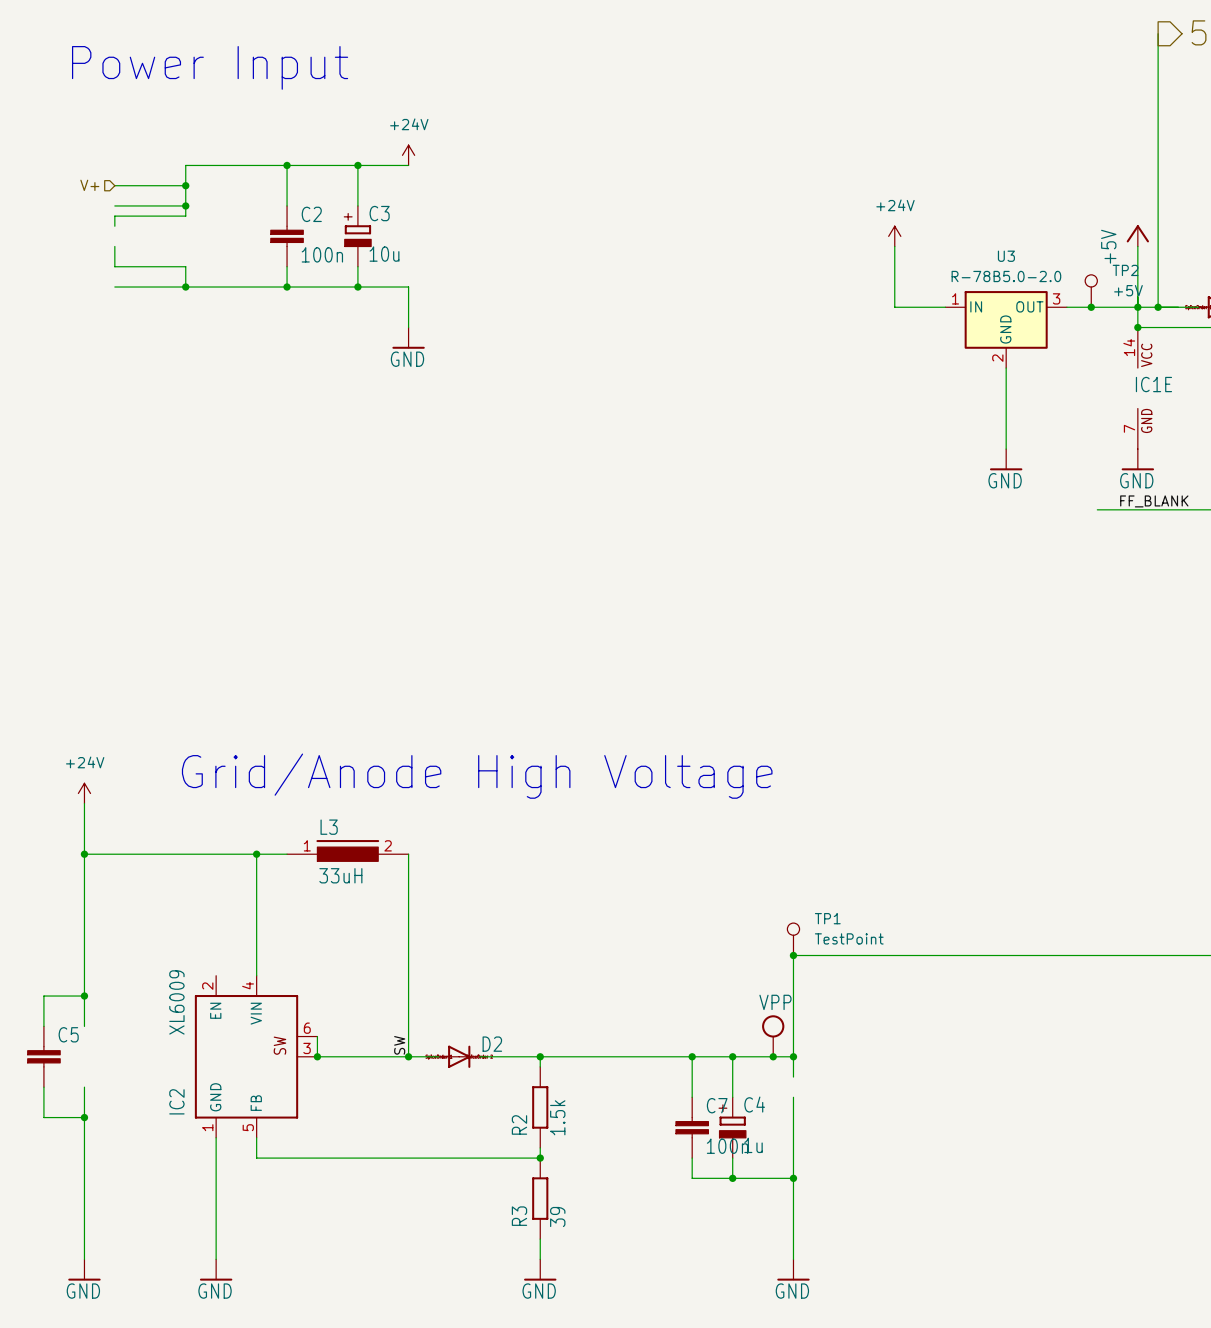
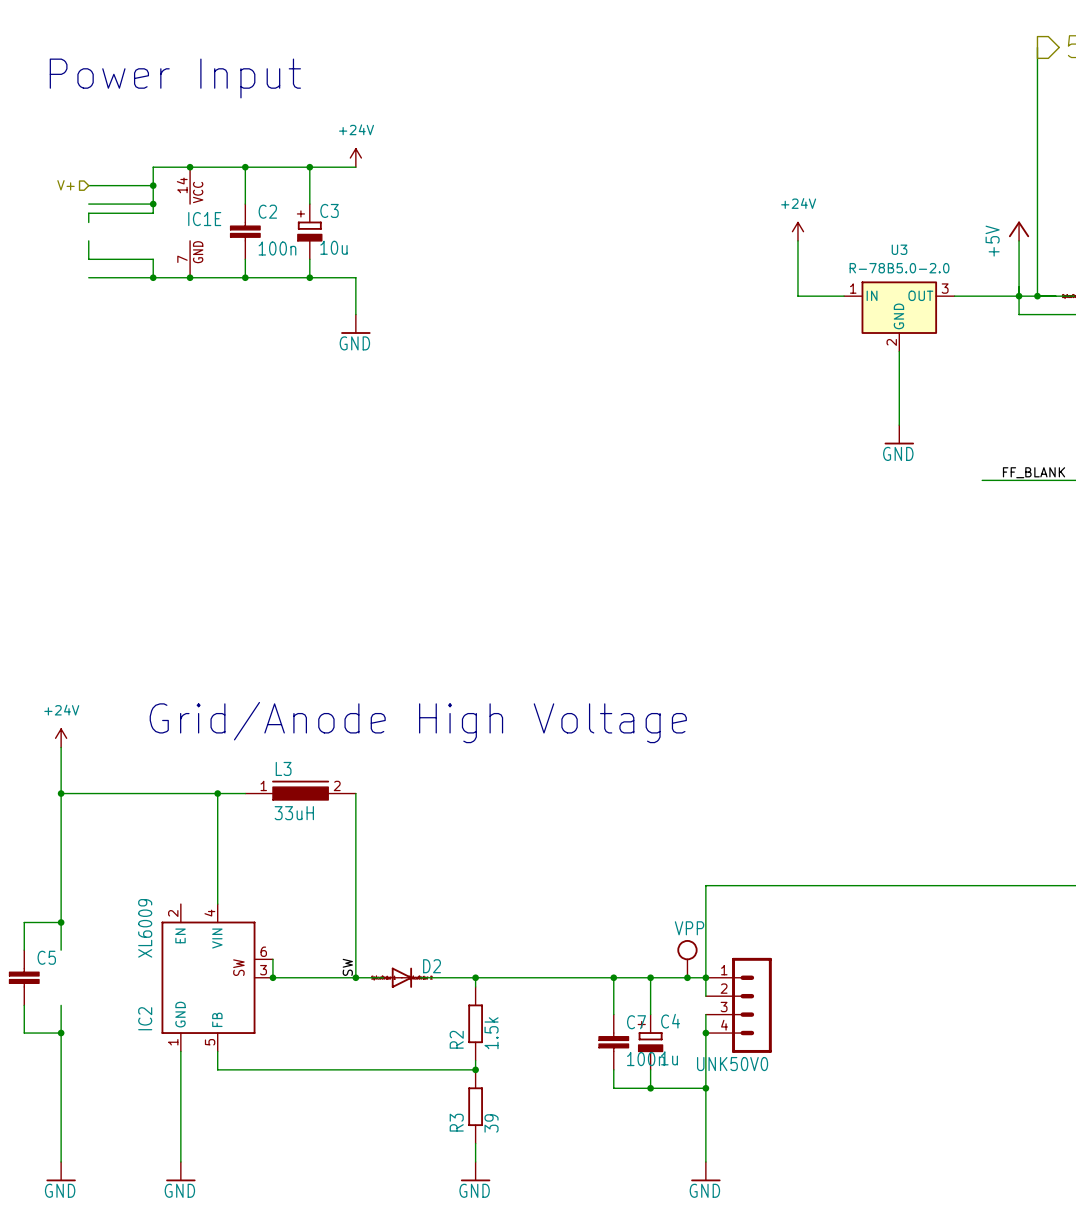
junction: none -> (190, 167)
junction: none -> (190, 277)
TP2: +5V (1091, 291) -> none
junction: (1091, 307) -> none
junction: (1137, 327) -> none
IC1E position: (1137, 388) -> (190, 222)
power symbol: GND (1137, 459) -> none
TP1: TestPoint (793, 939) -> none
junction: (793, 955) -> none
UNK50V0: none -> (738, 1005)
junction: none -> (705, 1033)

